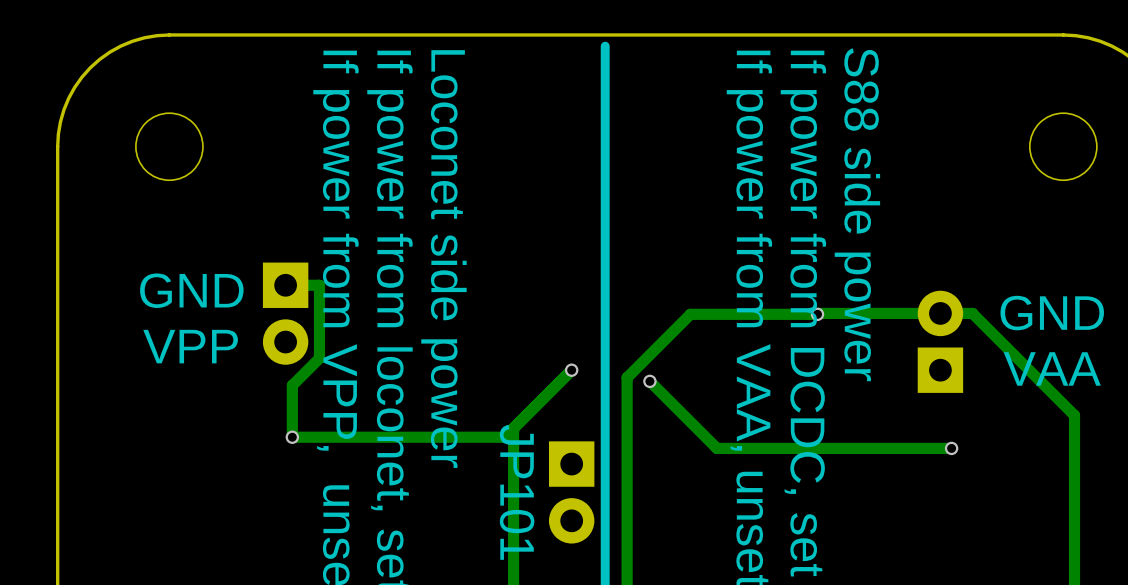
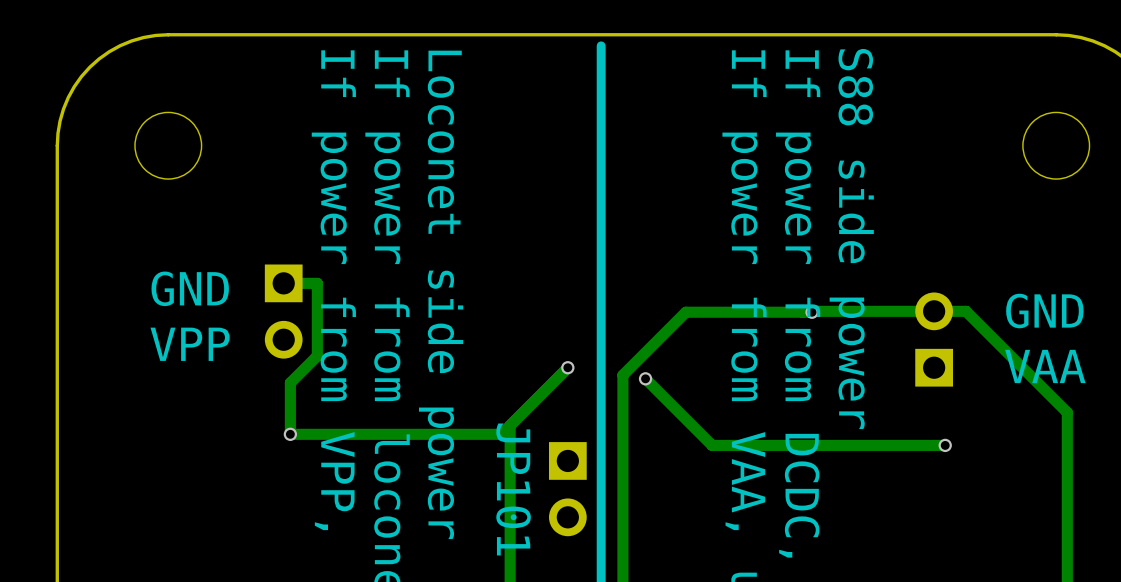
part footprint: [262, 262, 309, 365] -> [264, 264, 303, 359]
part footprint: [917, 290, 964, 393] -> [915, 292, 953, 387]
part footprint: [548, 441, 595, 544] -> [548, 442, 587, 537]

